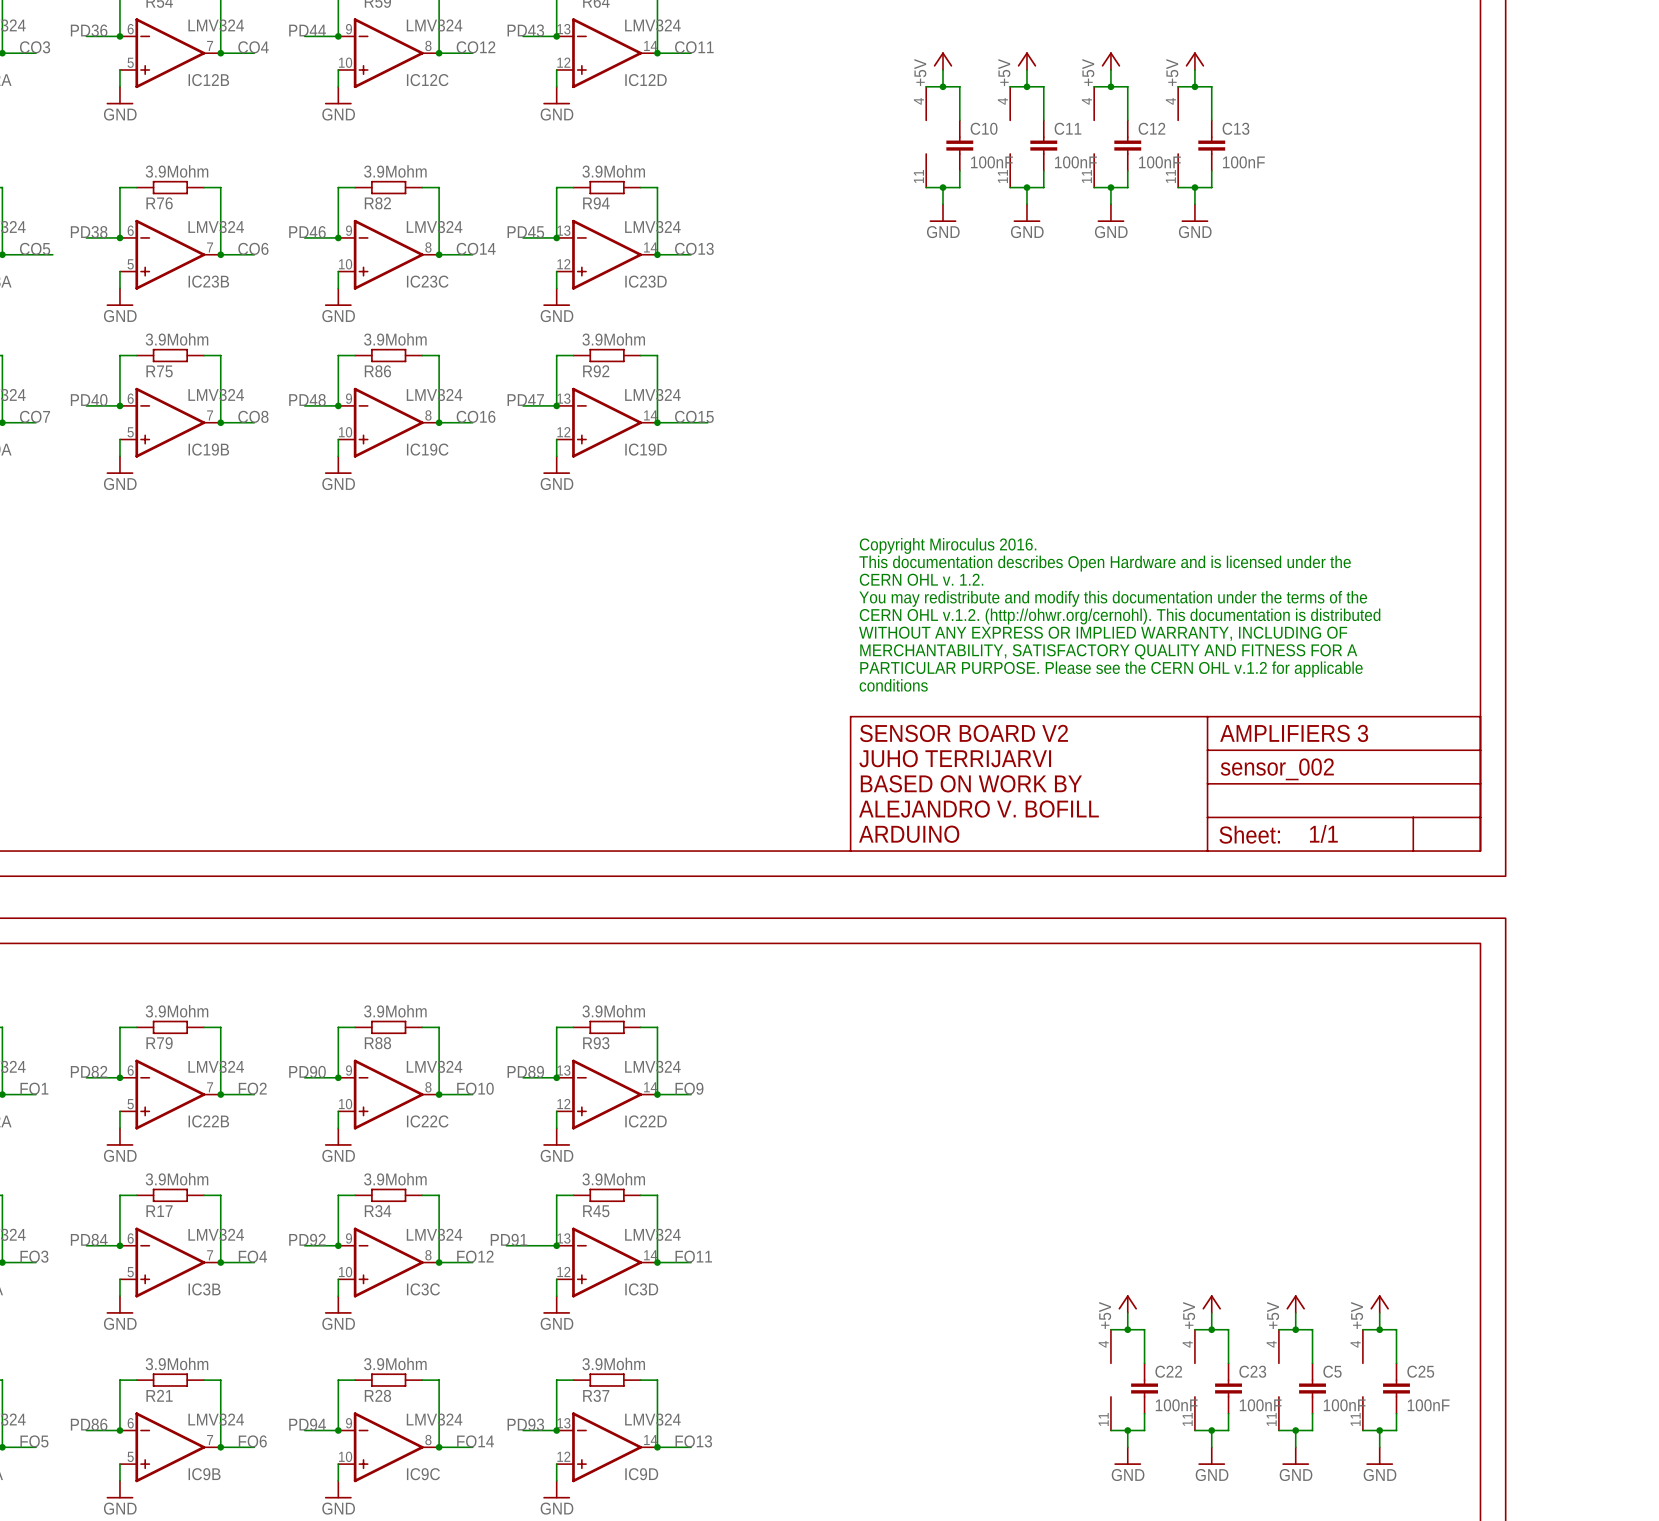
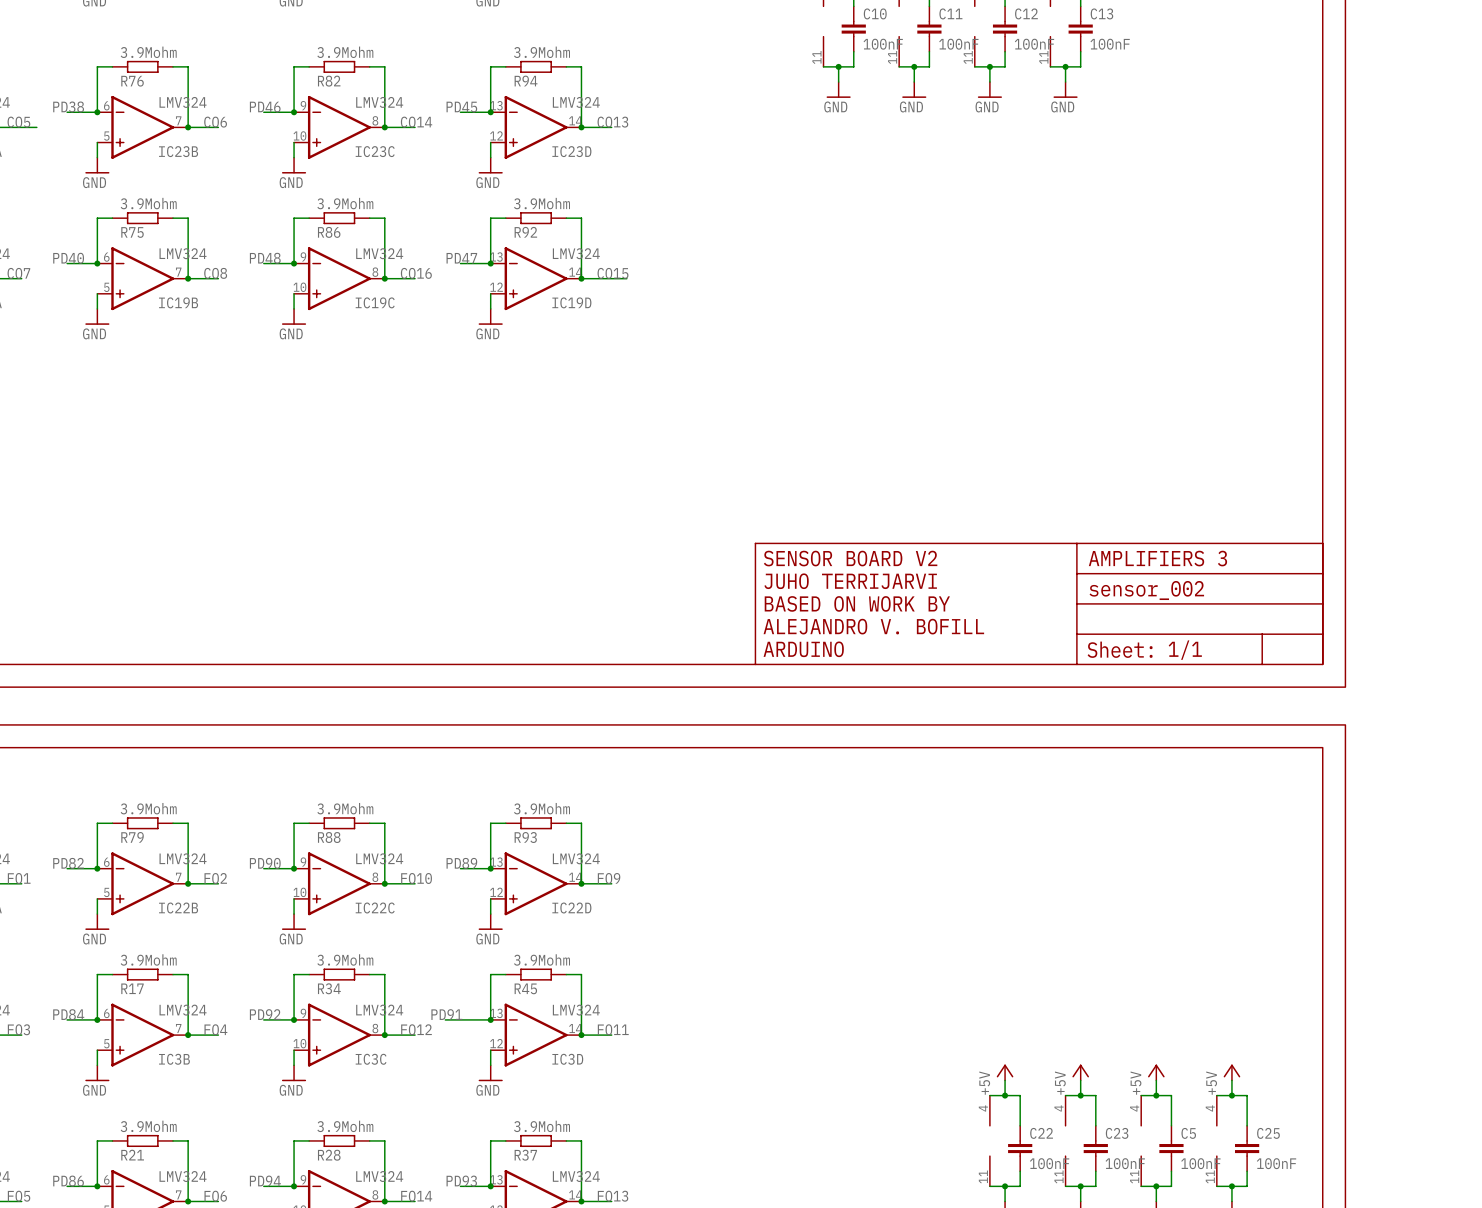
text: Copyright Miroculus 2016. (948, 545) -> none
text: This documentation describes Open Hardware and is licensed under the (1105, 563) -> none
text: CERN OHL v. 1.2. (921, 579) -> none
text: You may redistribute and modify this documentation under the terms of the (1113, 598) -> none
text: CERN OHL v.1.2. (http://ohwr.org/cernohl). This documentation is distributed (1120, 616) -> none
text: WITHOUT ANY EXPRESS OR IMPLIED WARRANTY, INCLUDING OF (1103, 633) -> none
text: MERCHANTABILITY, SATISFACTORY QUALITY AND FITNESS FOR A (1108, 651) -> none
text: PARTICULAR PURPOSE. Please see the CERN OHL v.1.2 for applicable (1111, 669) -> none
text: conditions (893, 685) -> none

